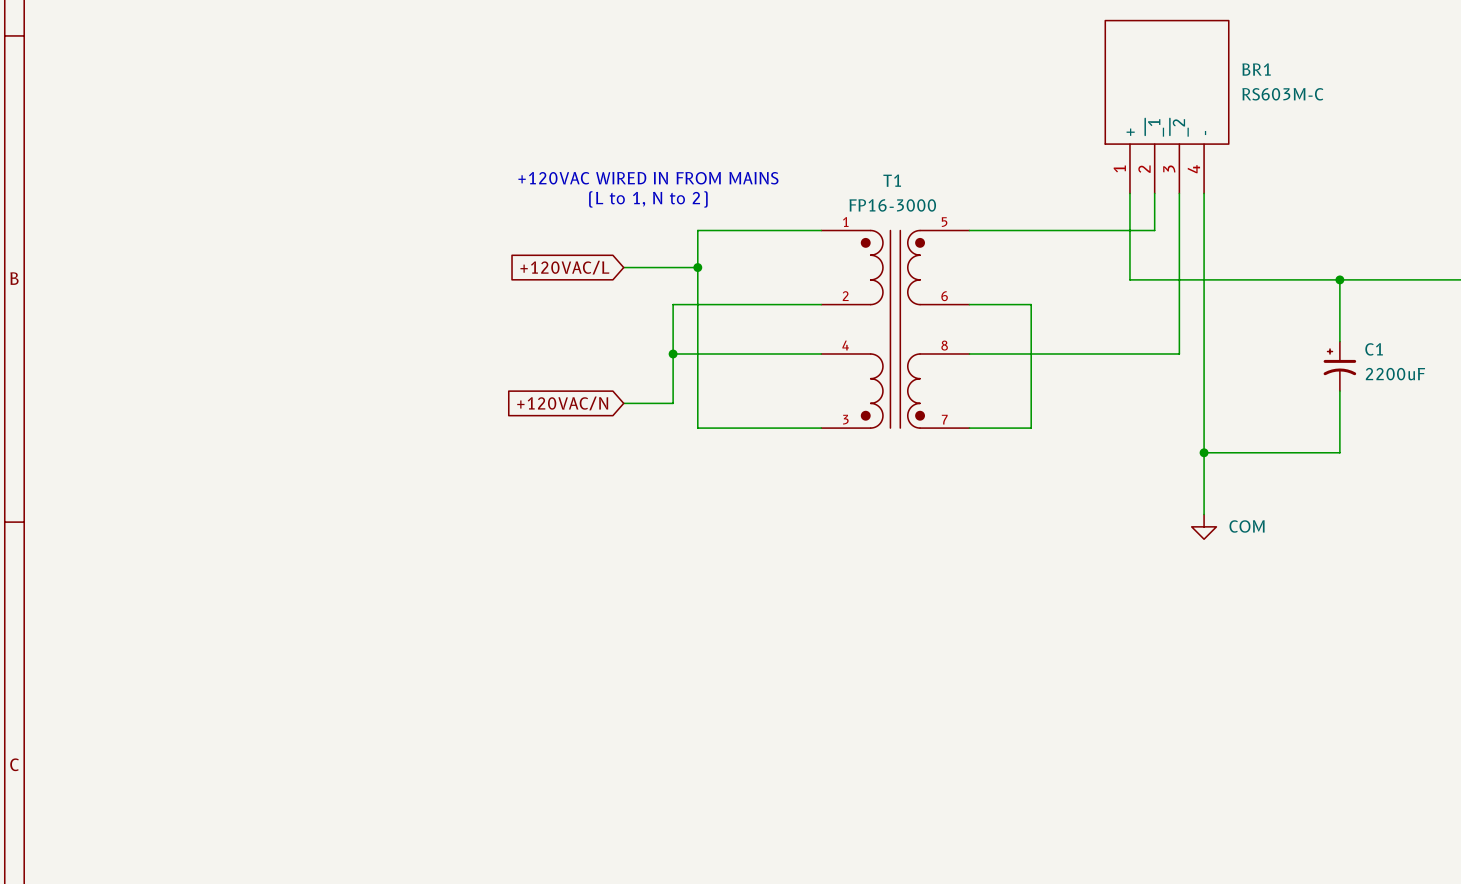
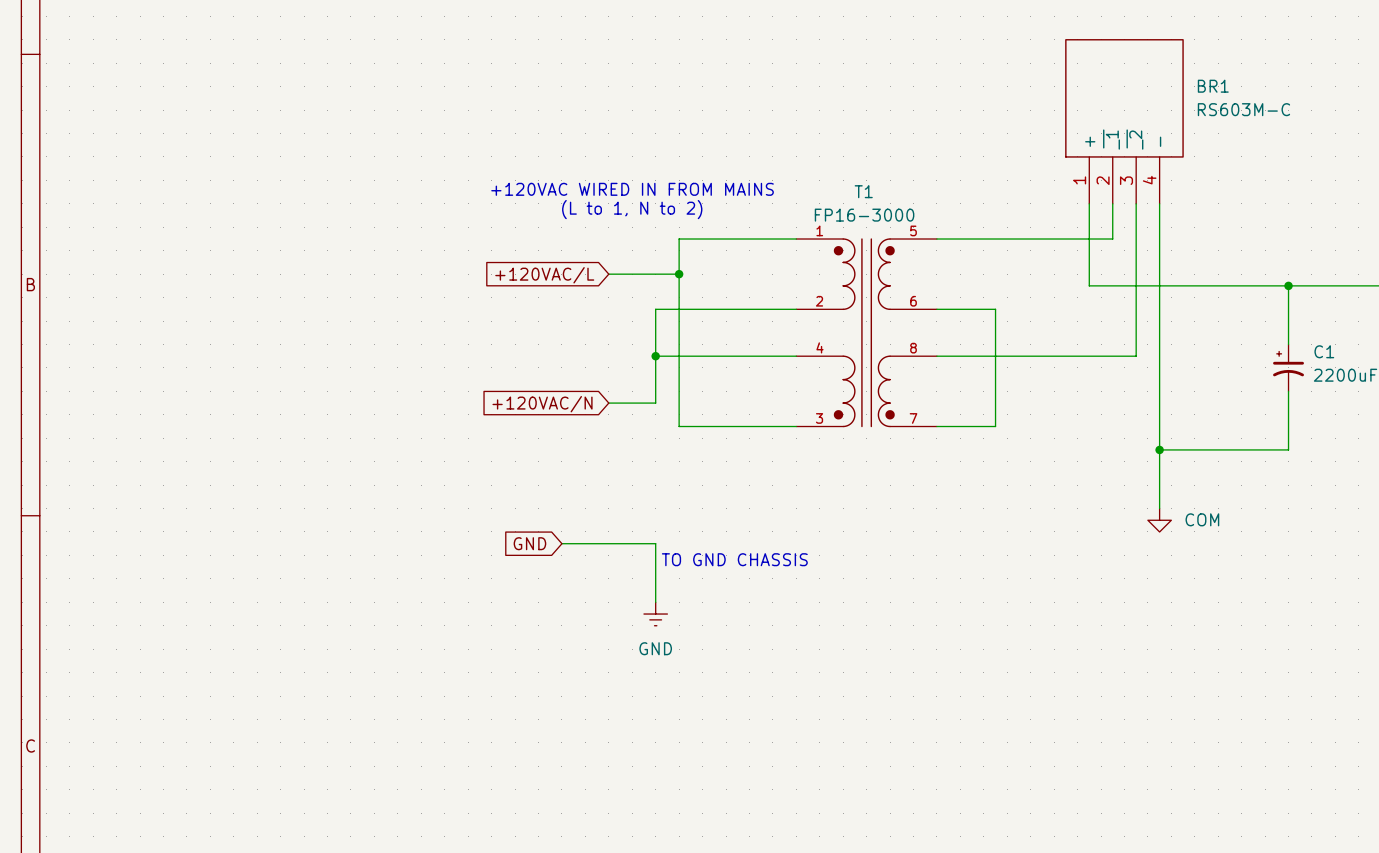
global label: none -> GND (529, 543)
wire: none -> (561, 543) (655, 543) (655, 602)
text: none -> TO GND CHASSIS (734, 559)
power symbol: none -> GND (655, 614)

